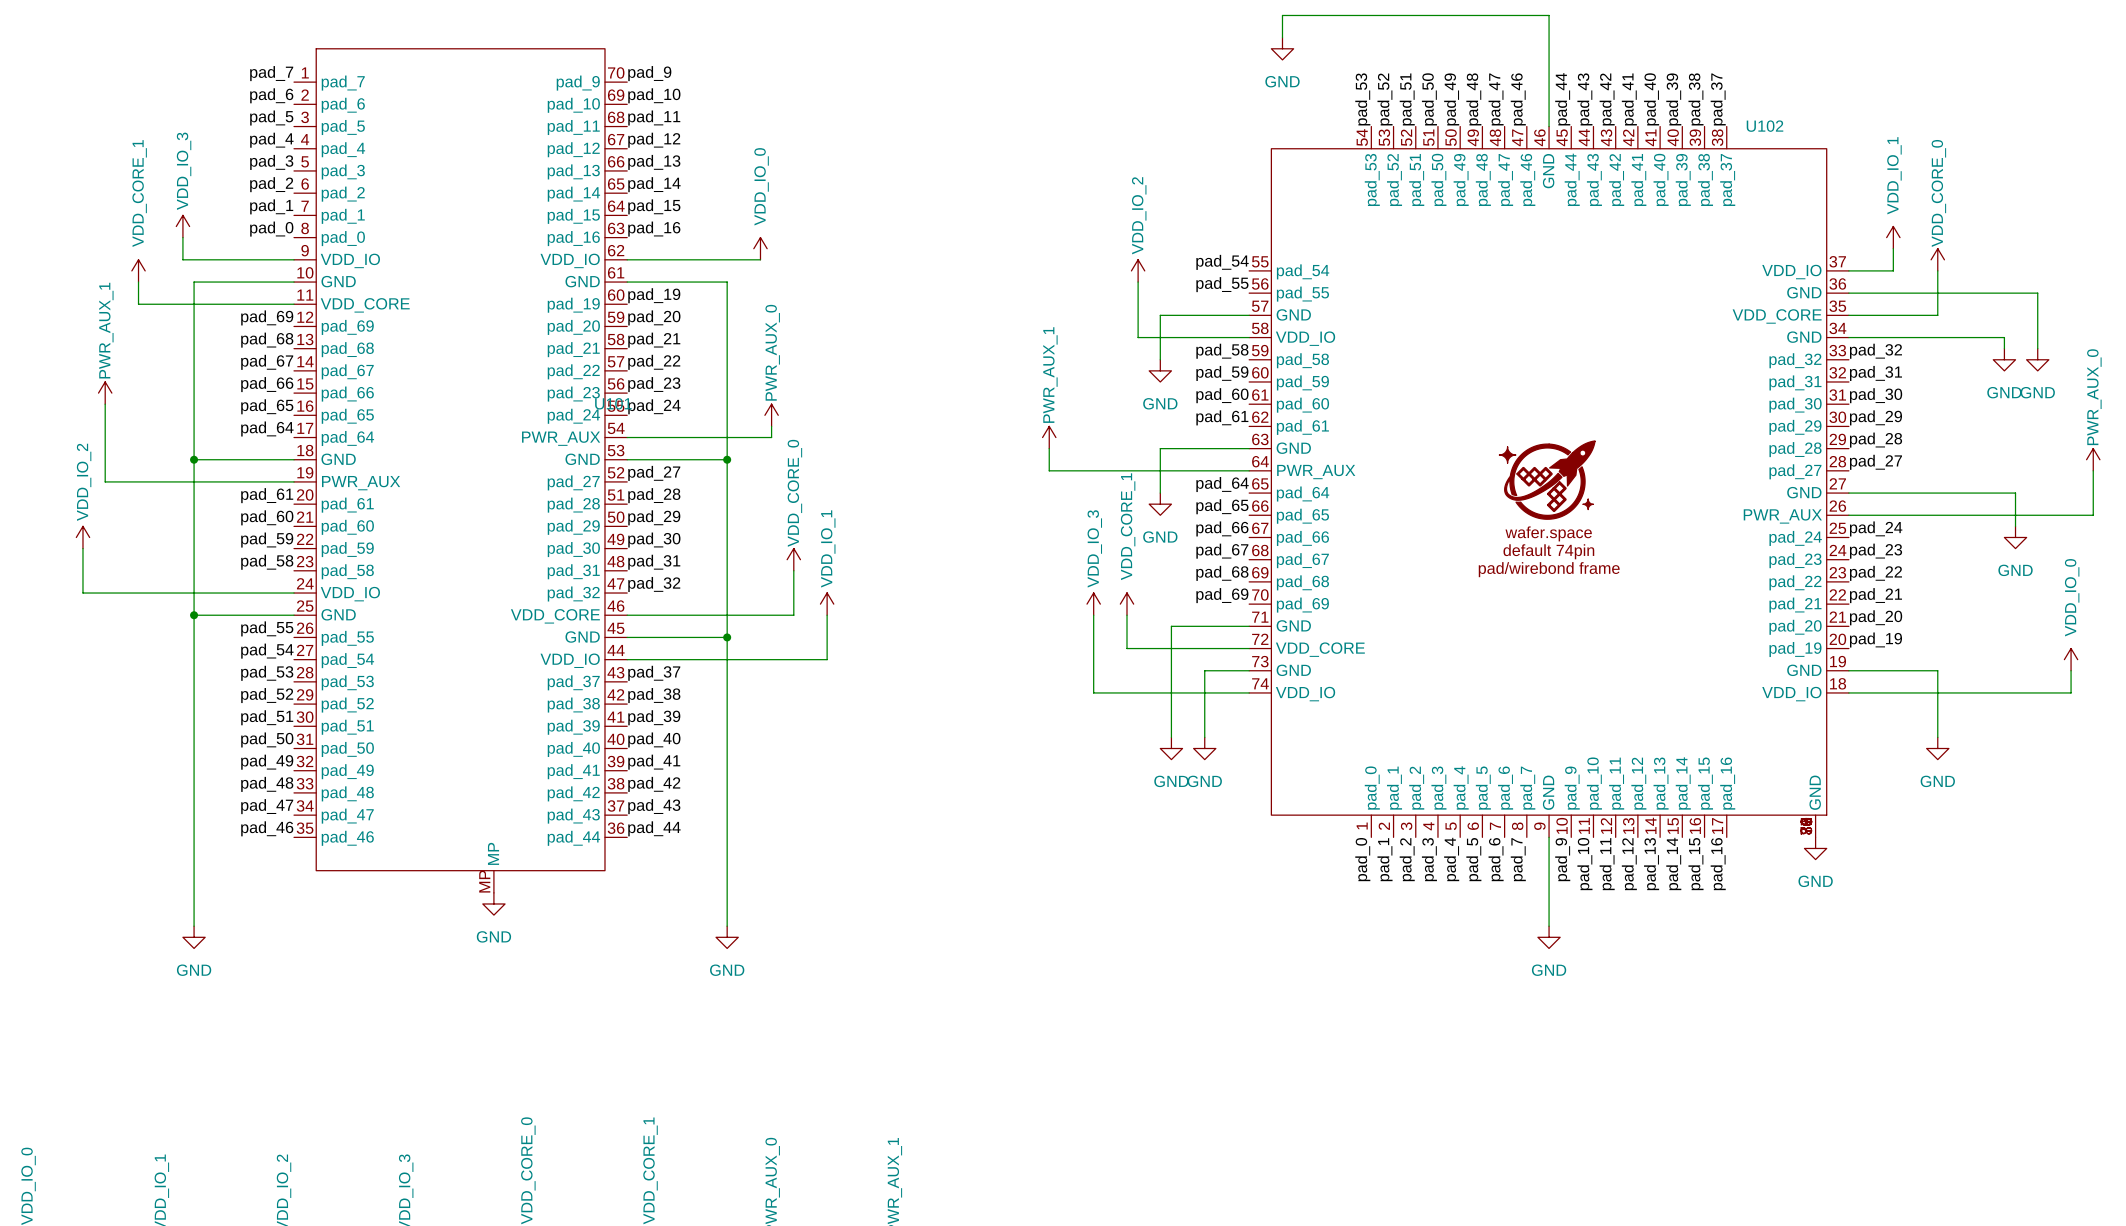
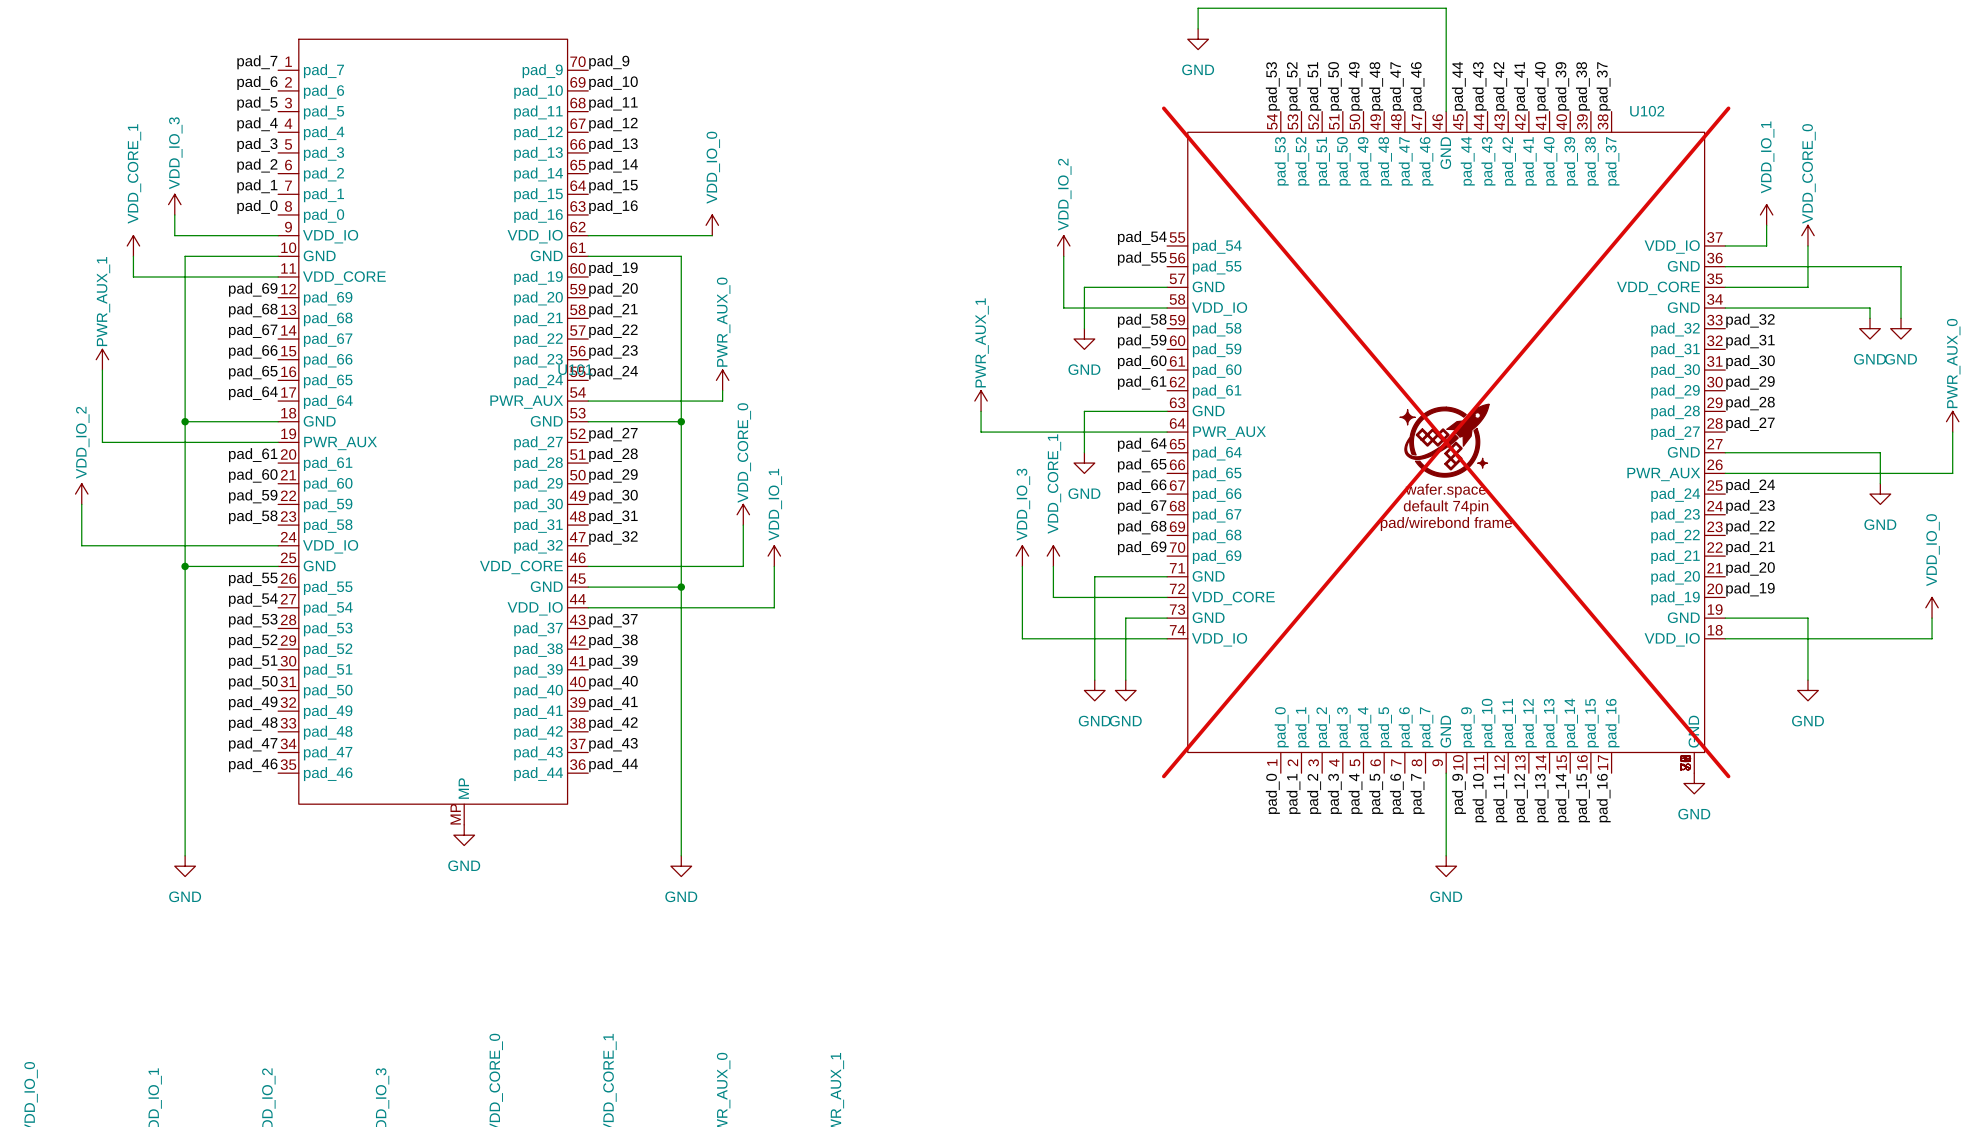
U102 do-not-place cross: none -> (1446, 442)

